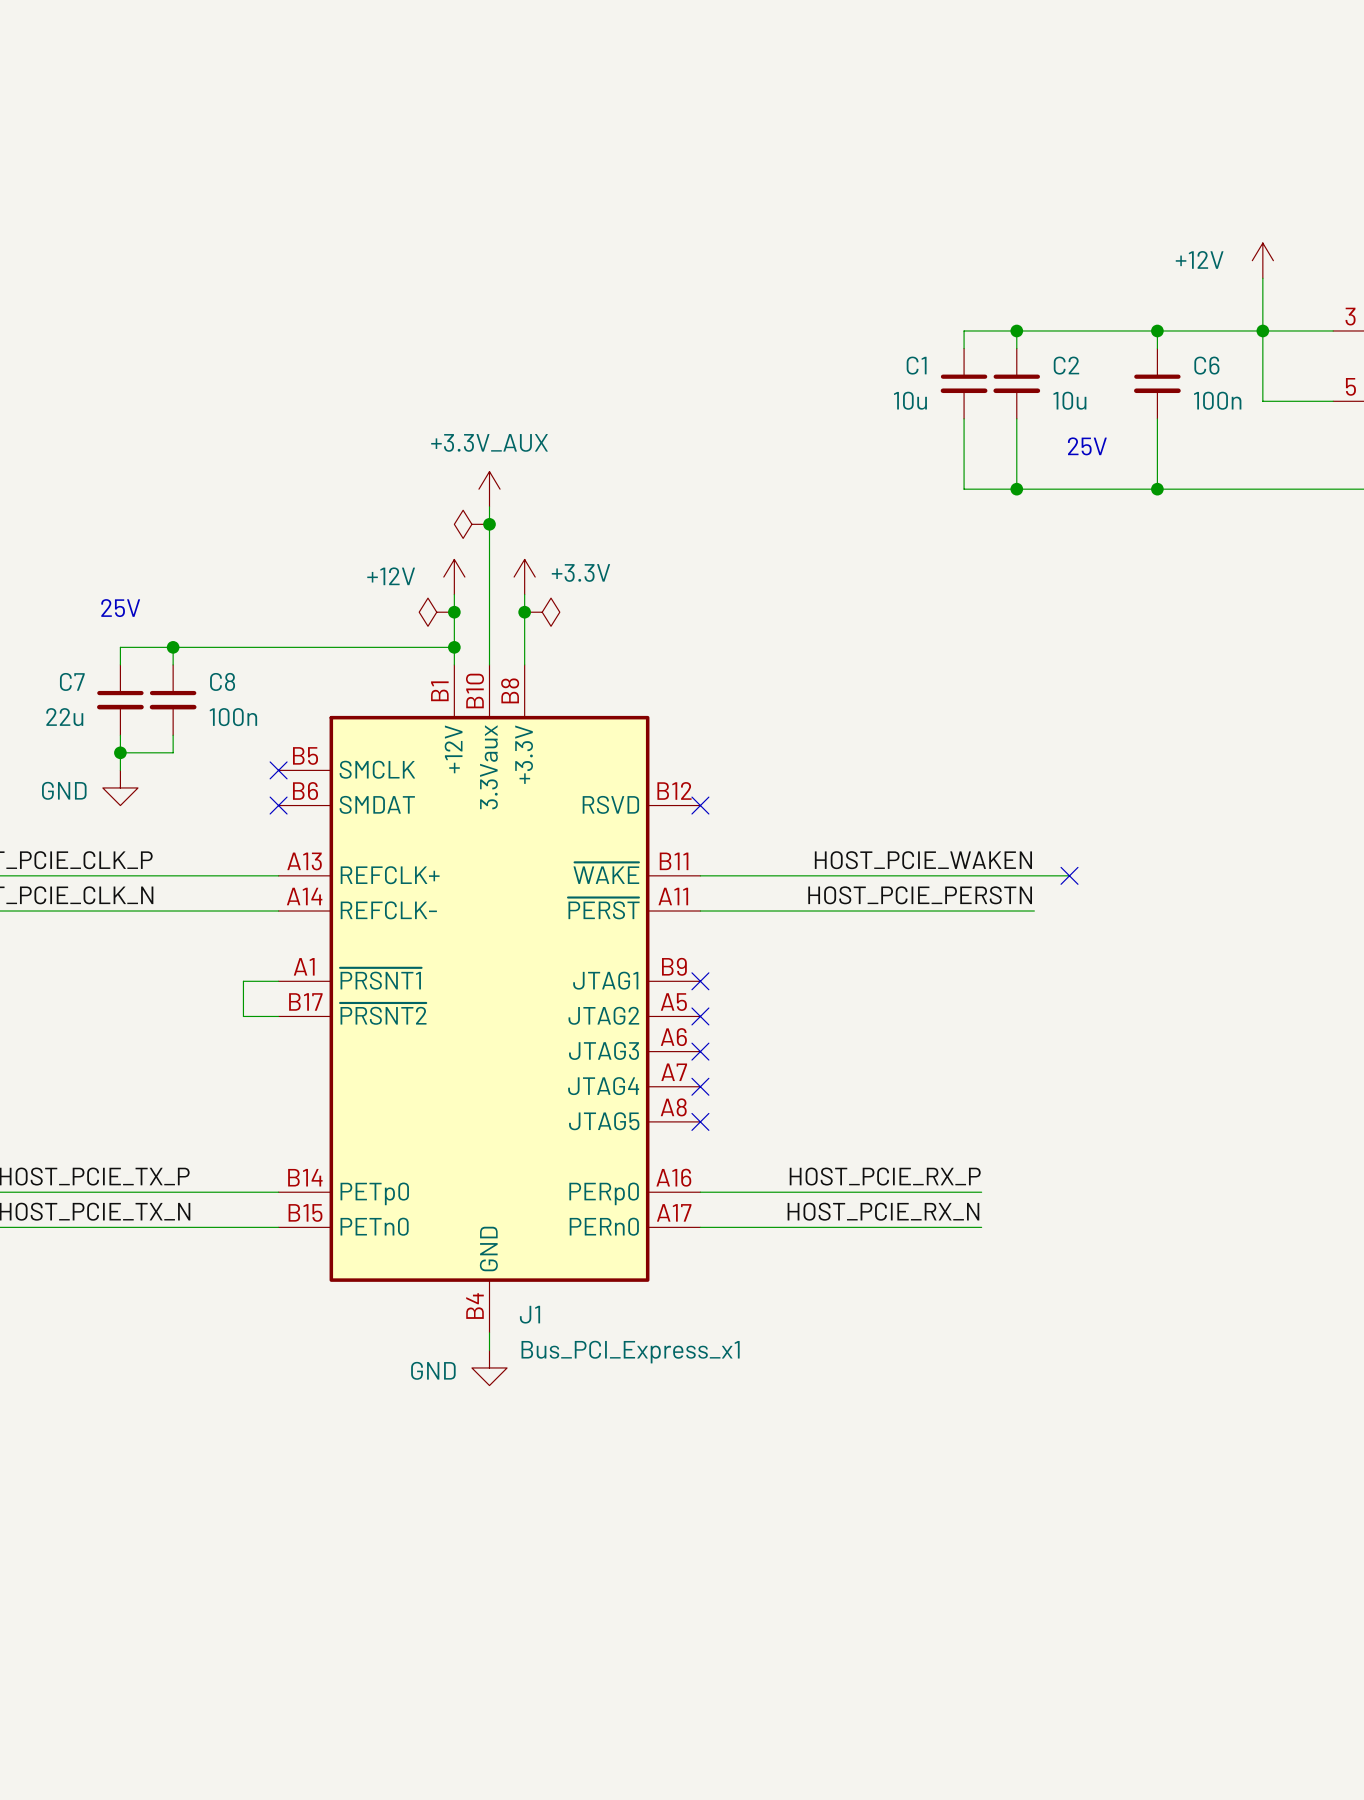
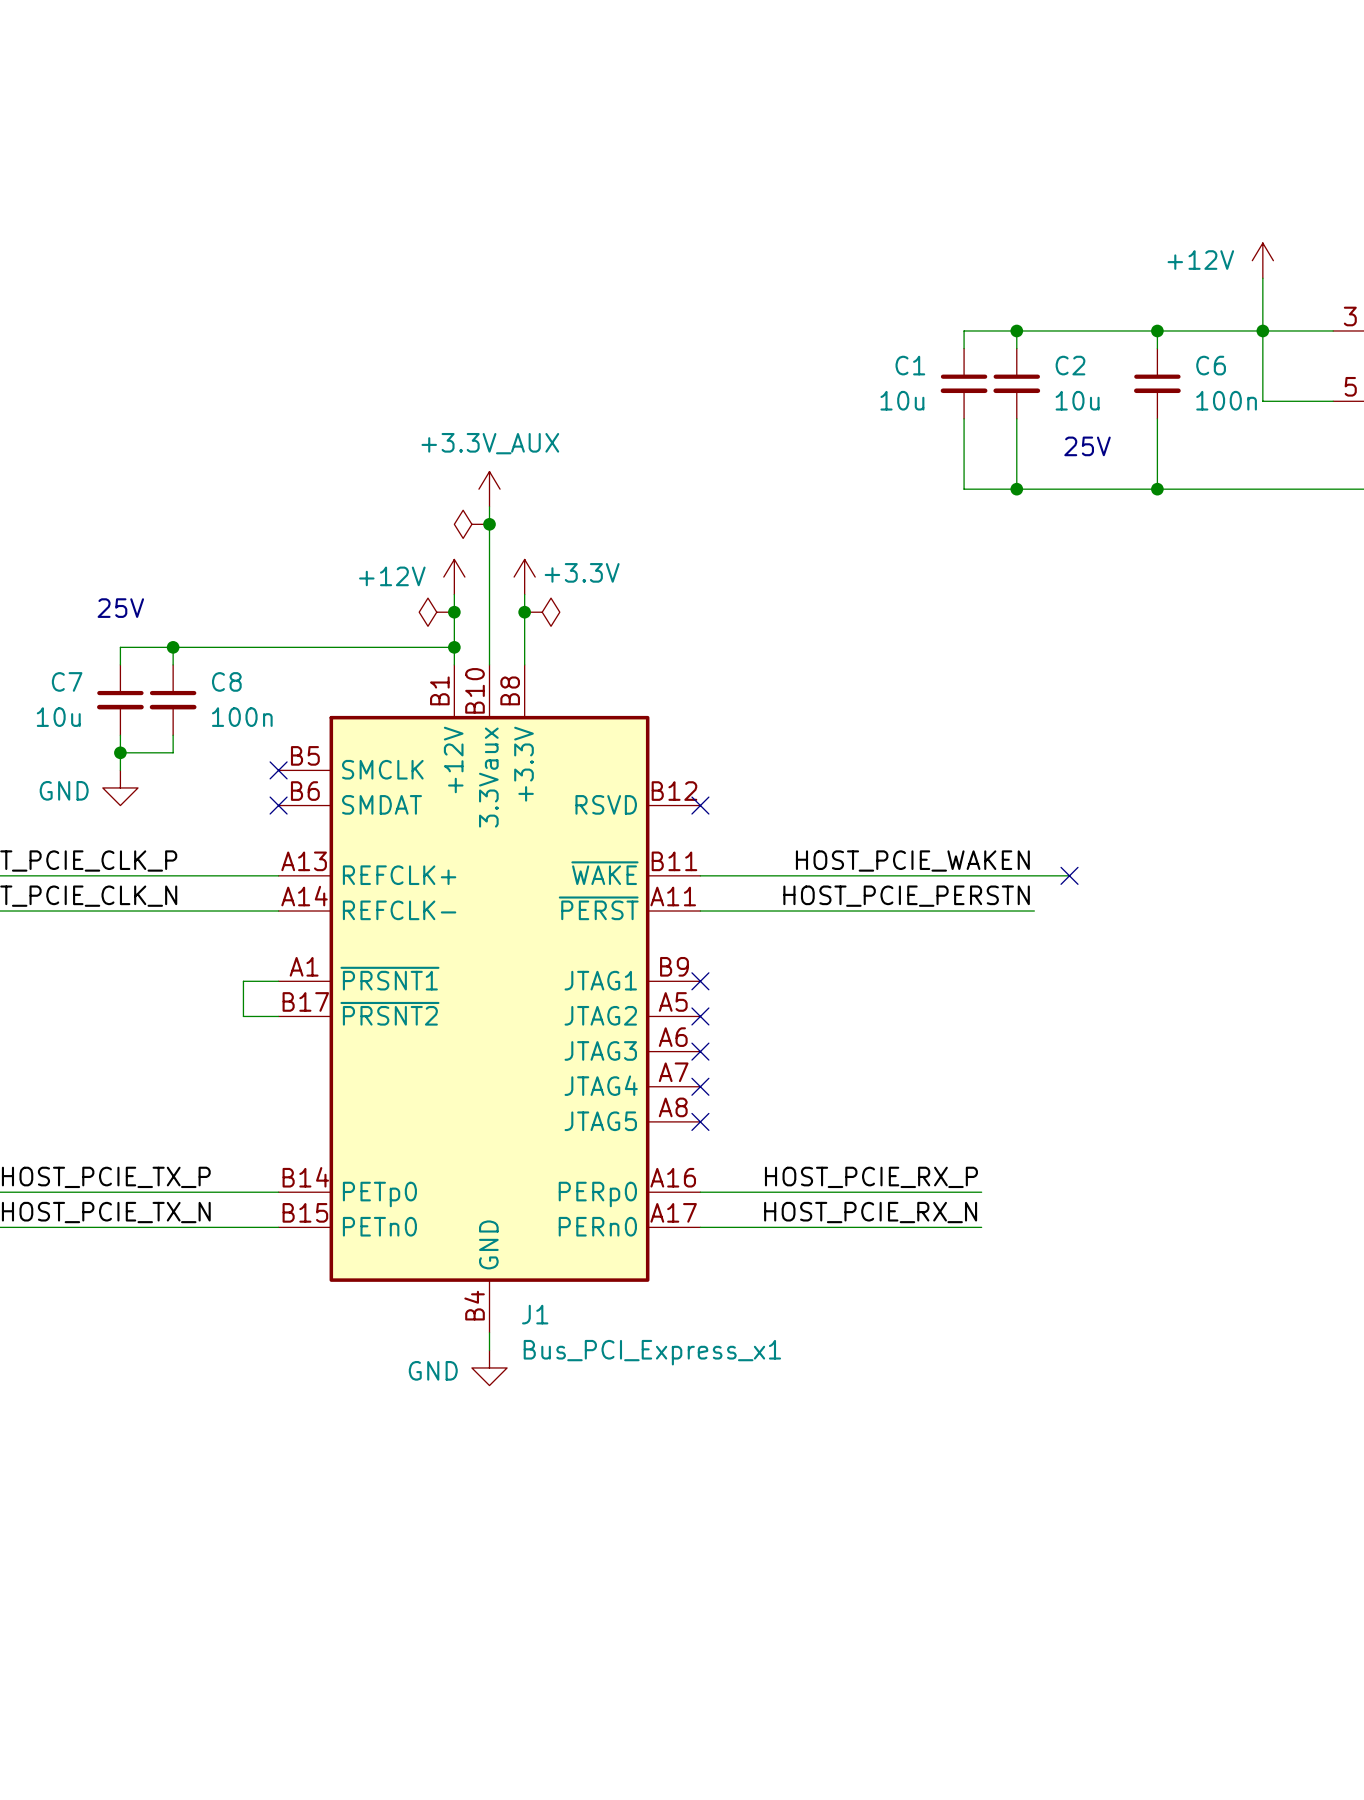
C7 value: 22u (64, 717) -> 10u (58, 717)

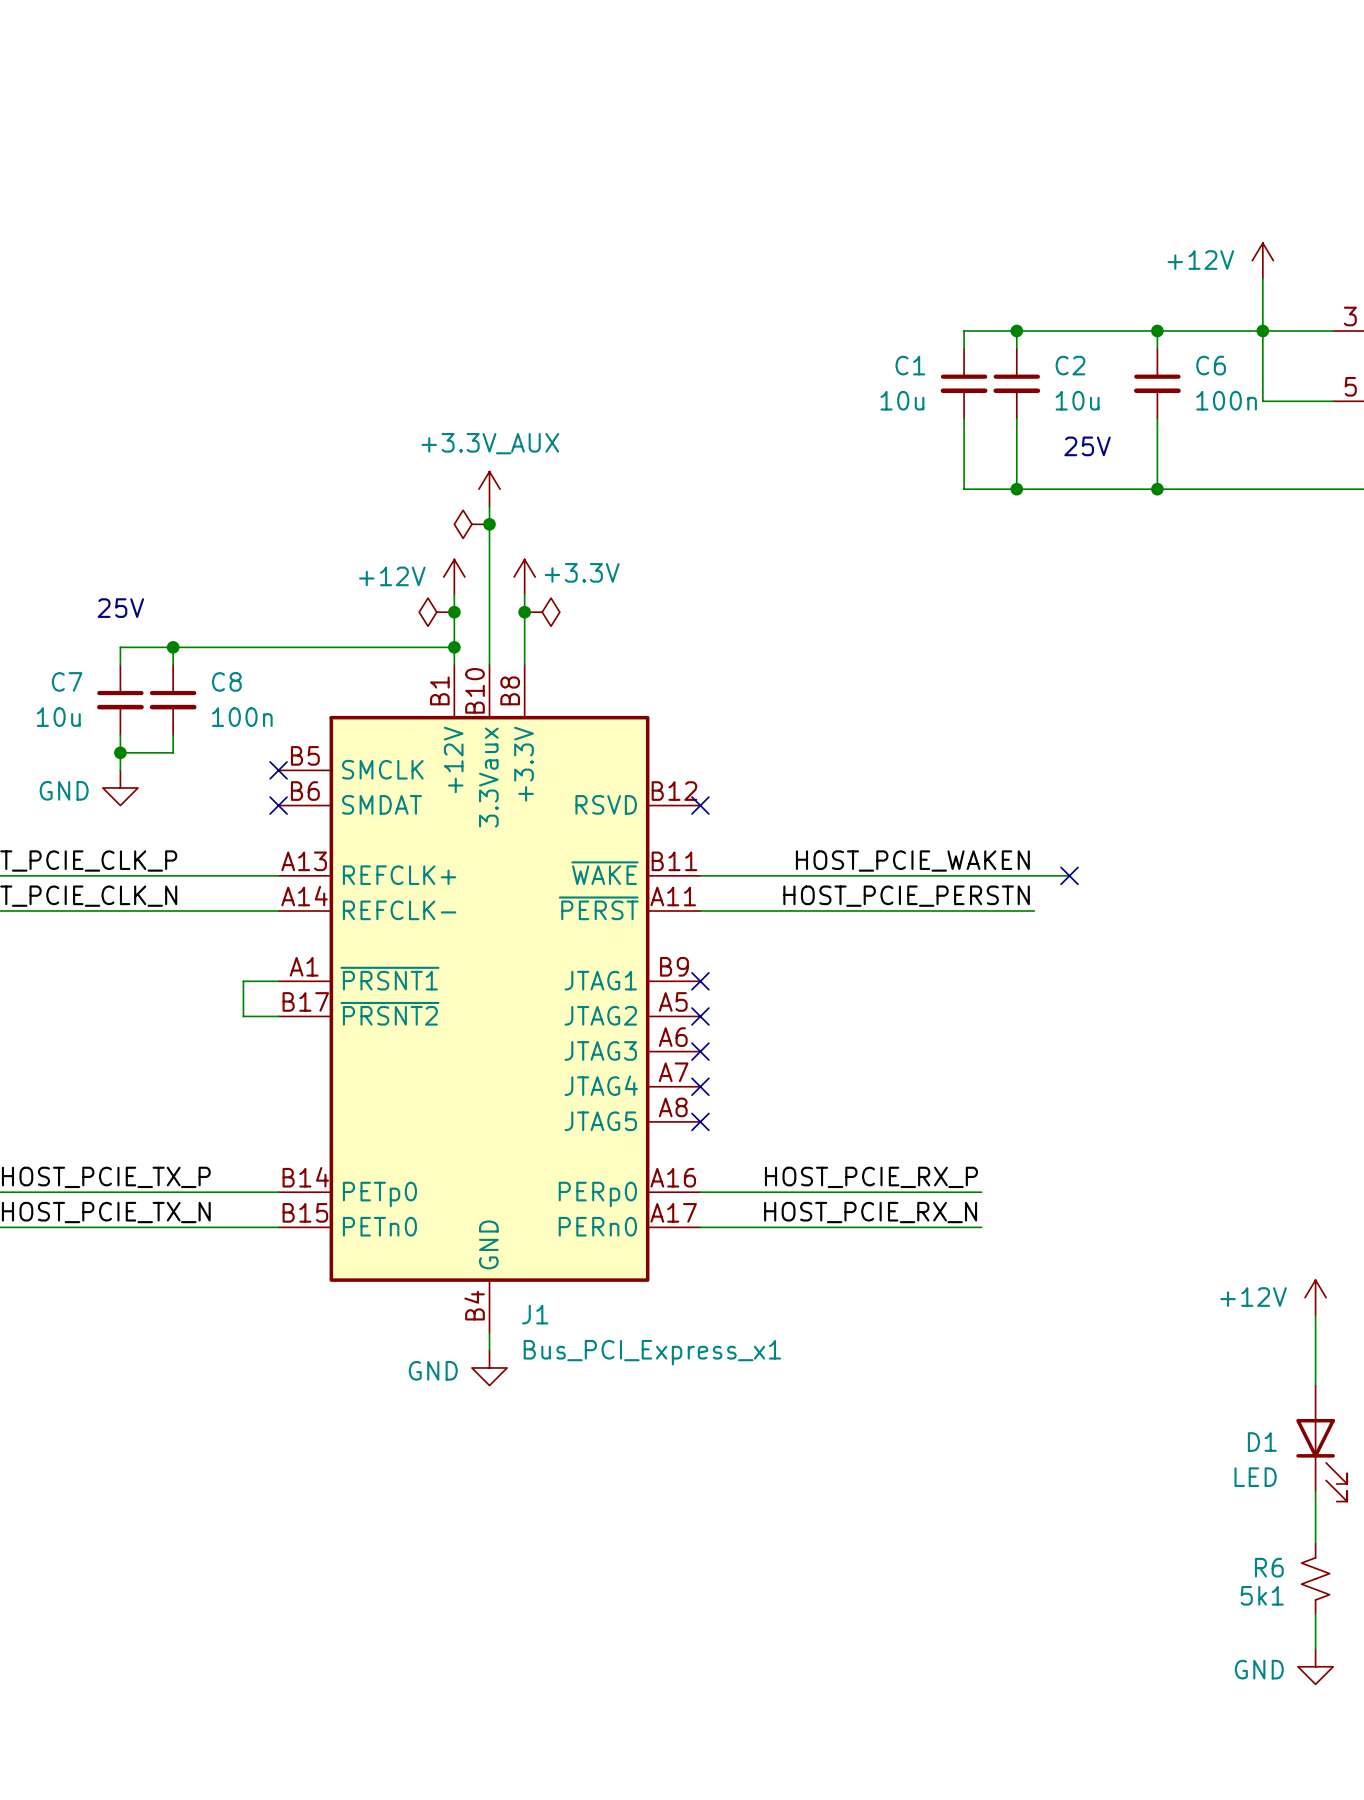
power symbol: none -> +12V (1315, 1297)
wire: none -> (1315, 1315) (1315, 1385)
D1: none -> LED (1321, 1443)
wire: none -> (1315, 1491) (1315, 1543)
R6: none -> 5k1 (1315, 1578)
wire: none -> (1315, 1614) (1315, 1649)
power symbol: none -> GND (1315, 1666)

